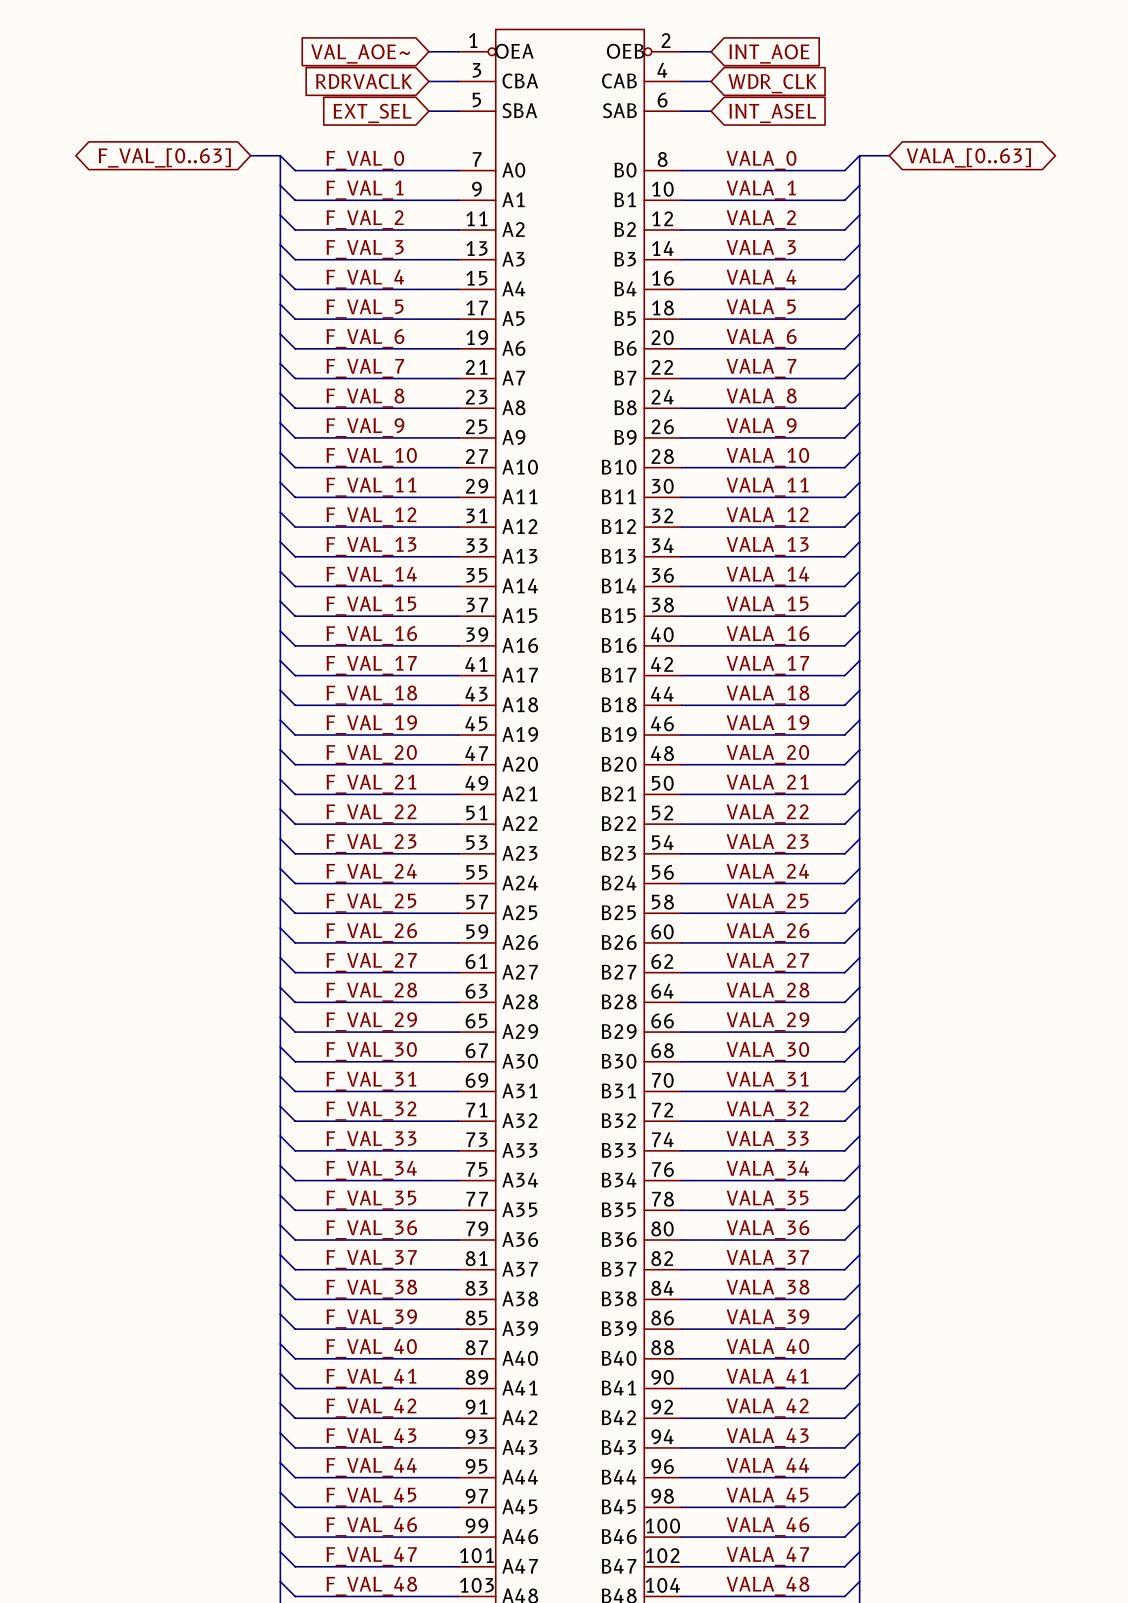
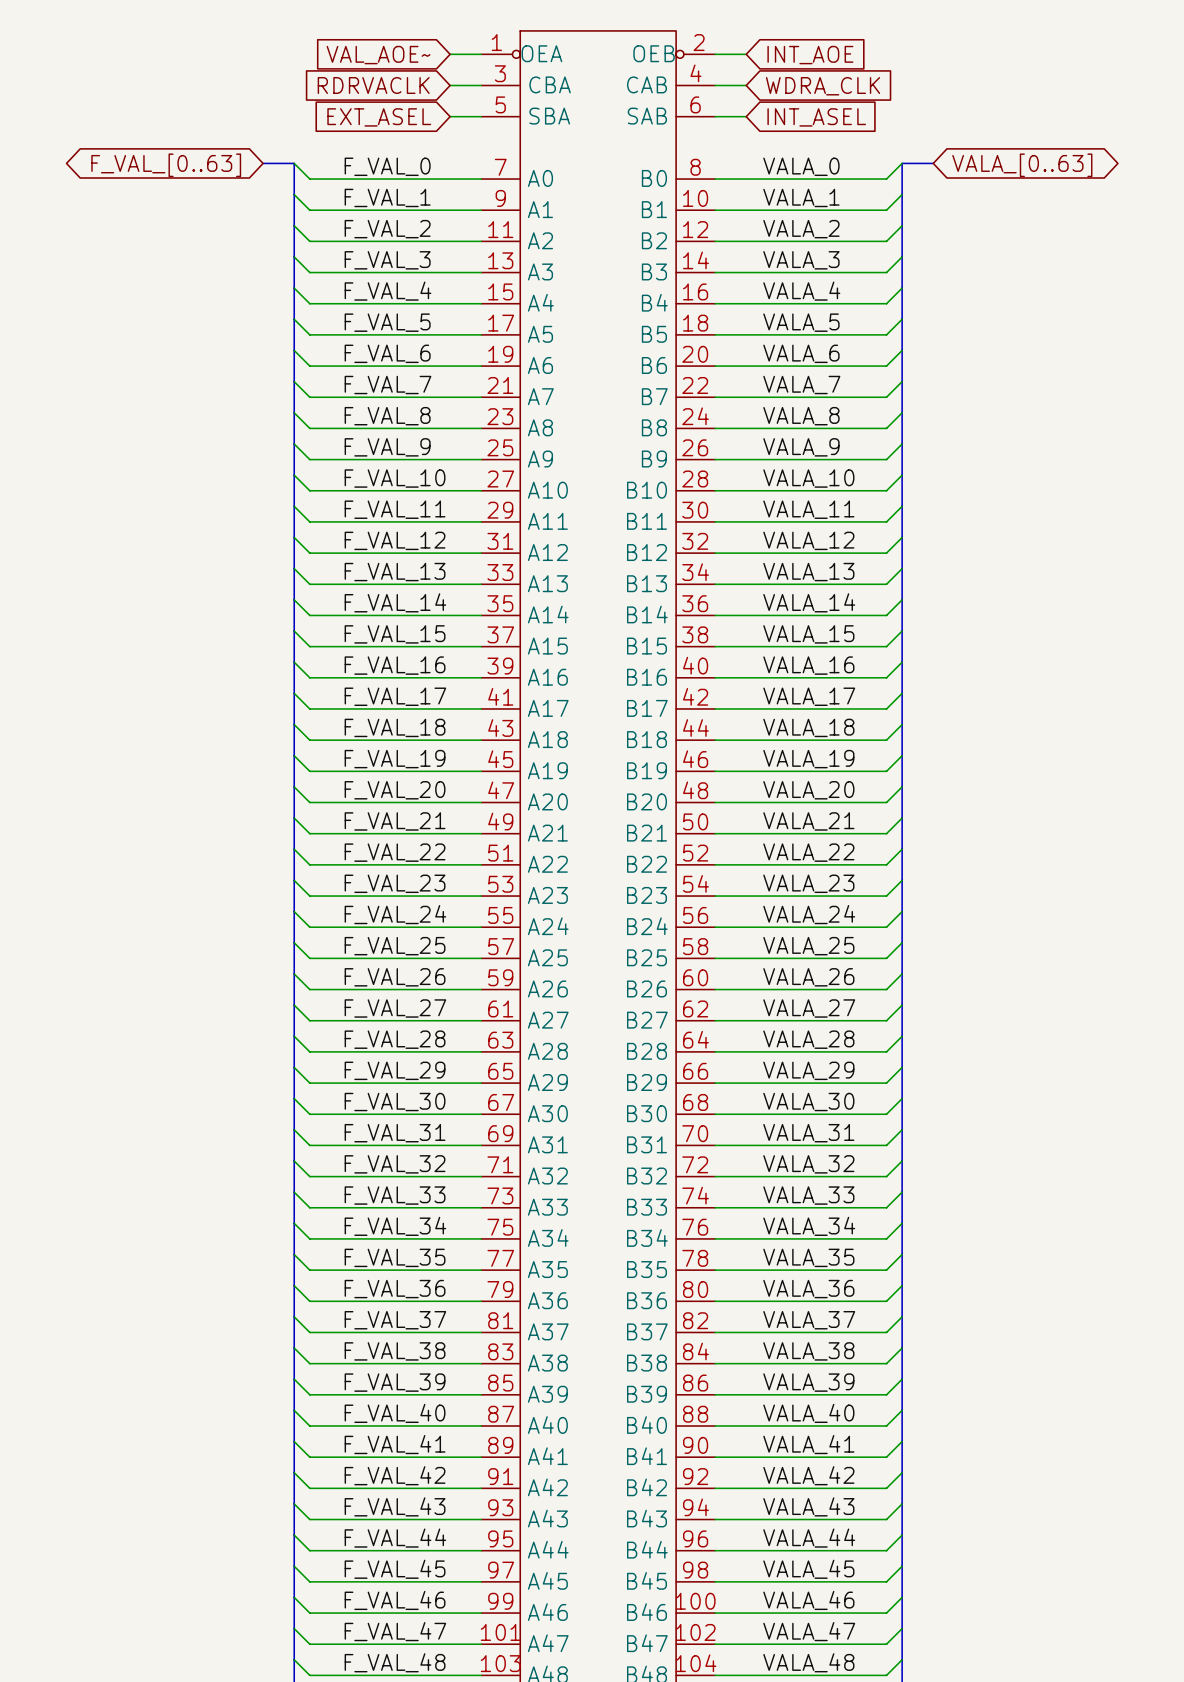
global label: WDR_CLK (772, 83) -> WDRA_CLK (823, 86)
global label: EXT_SEL (372, 113) -> EXT_ASEL (379, 117)

